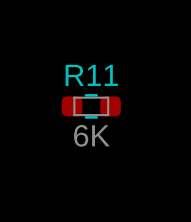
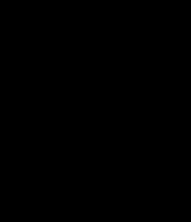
R11: 6K (91, 106) -> none

